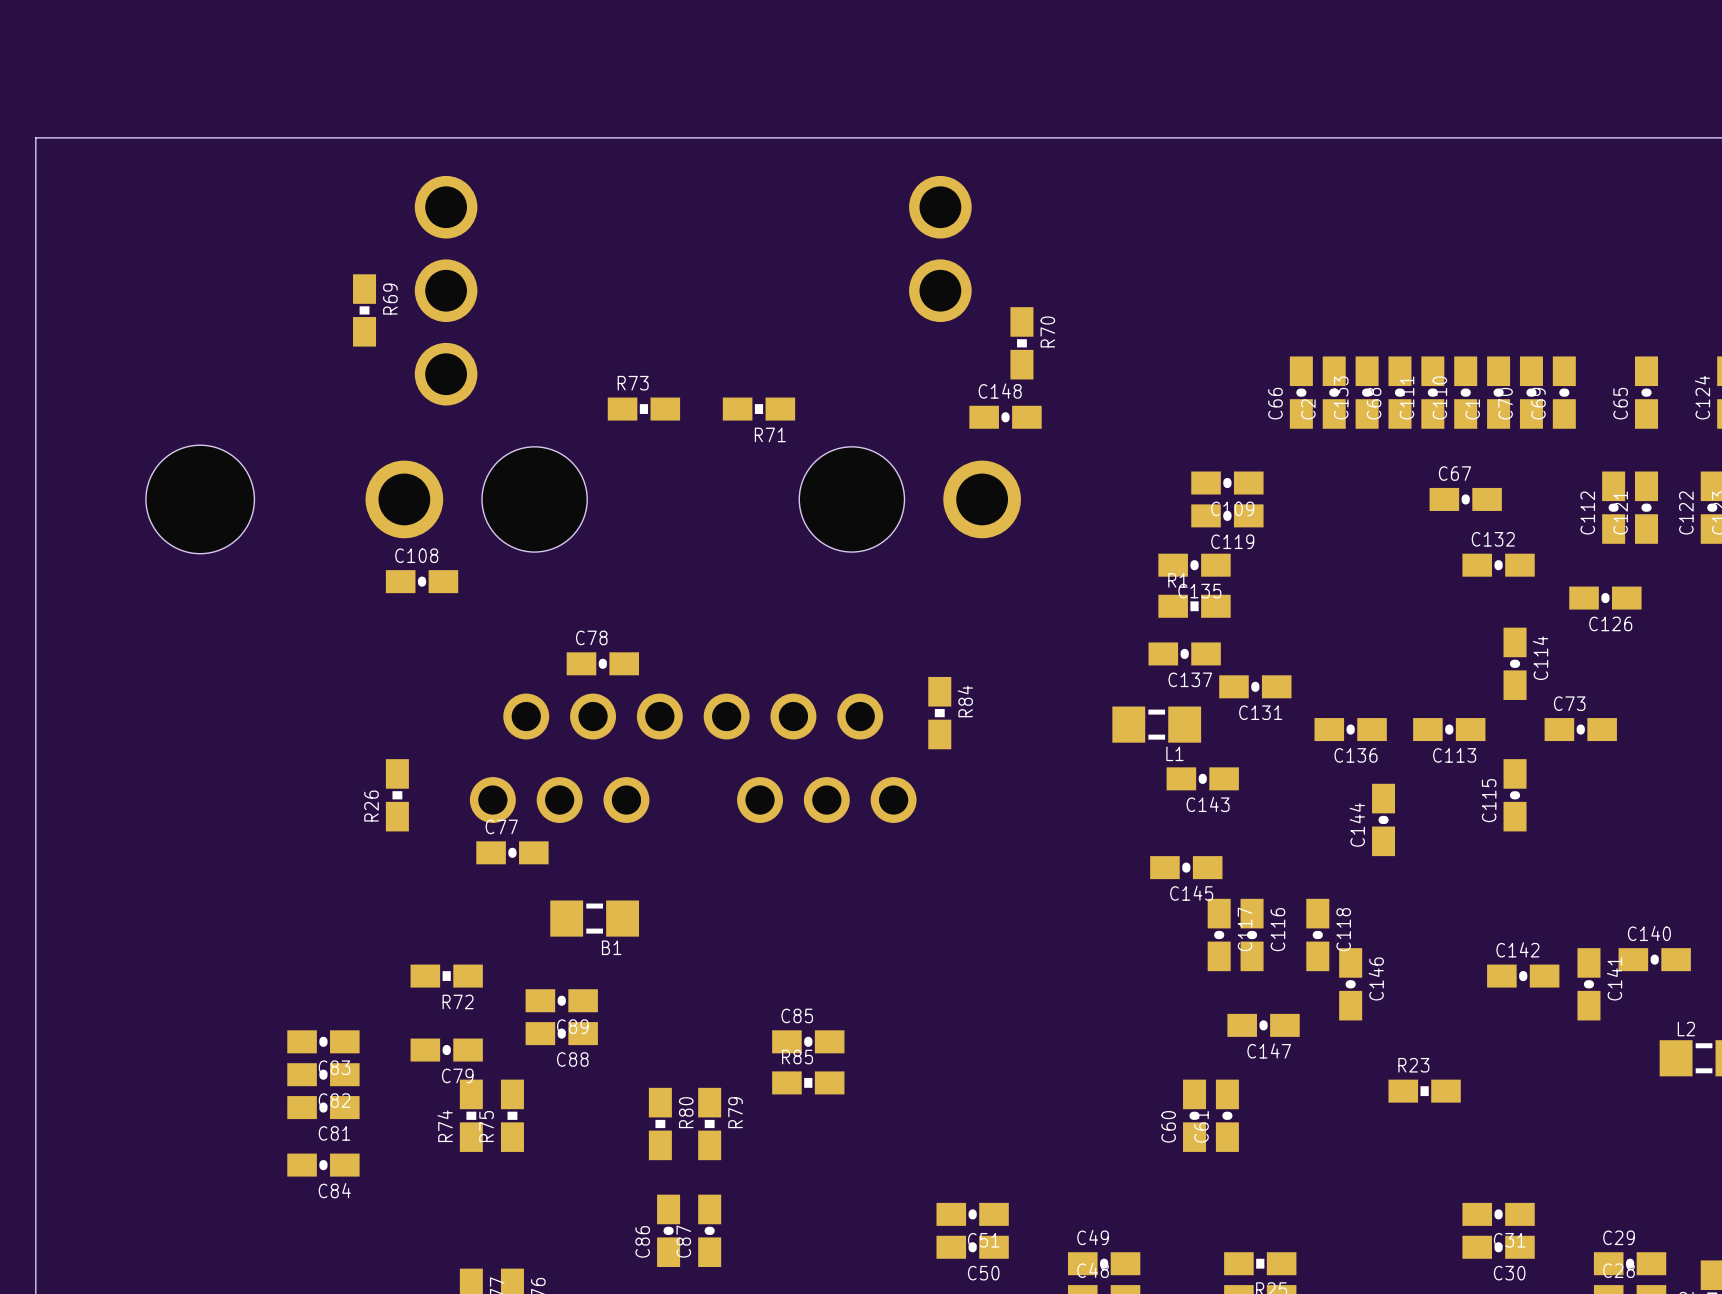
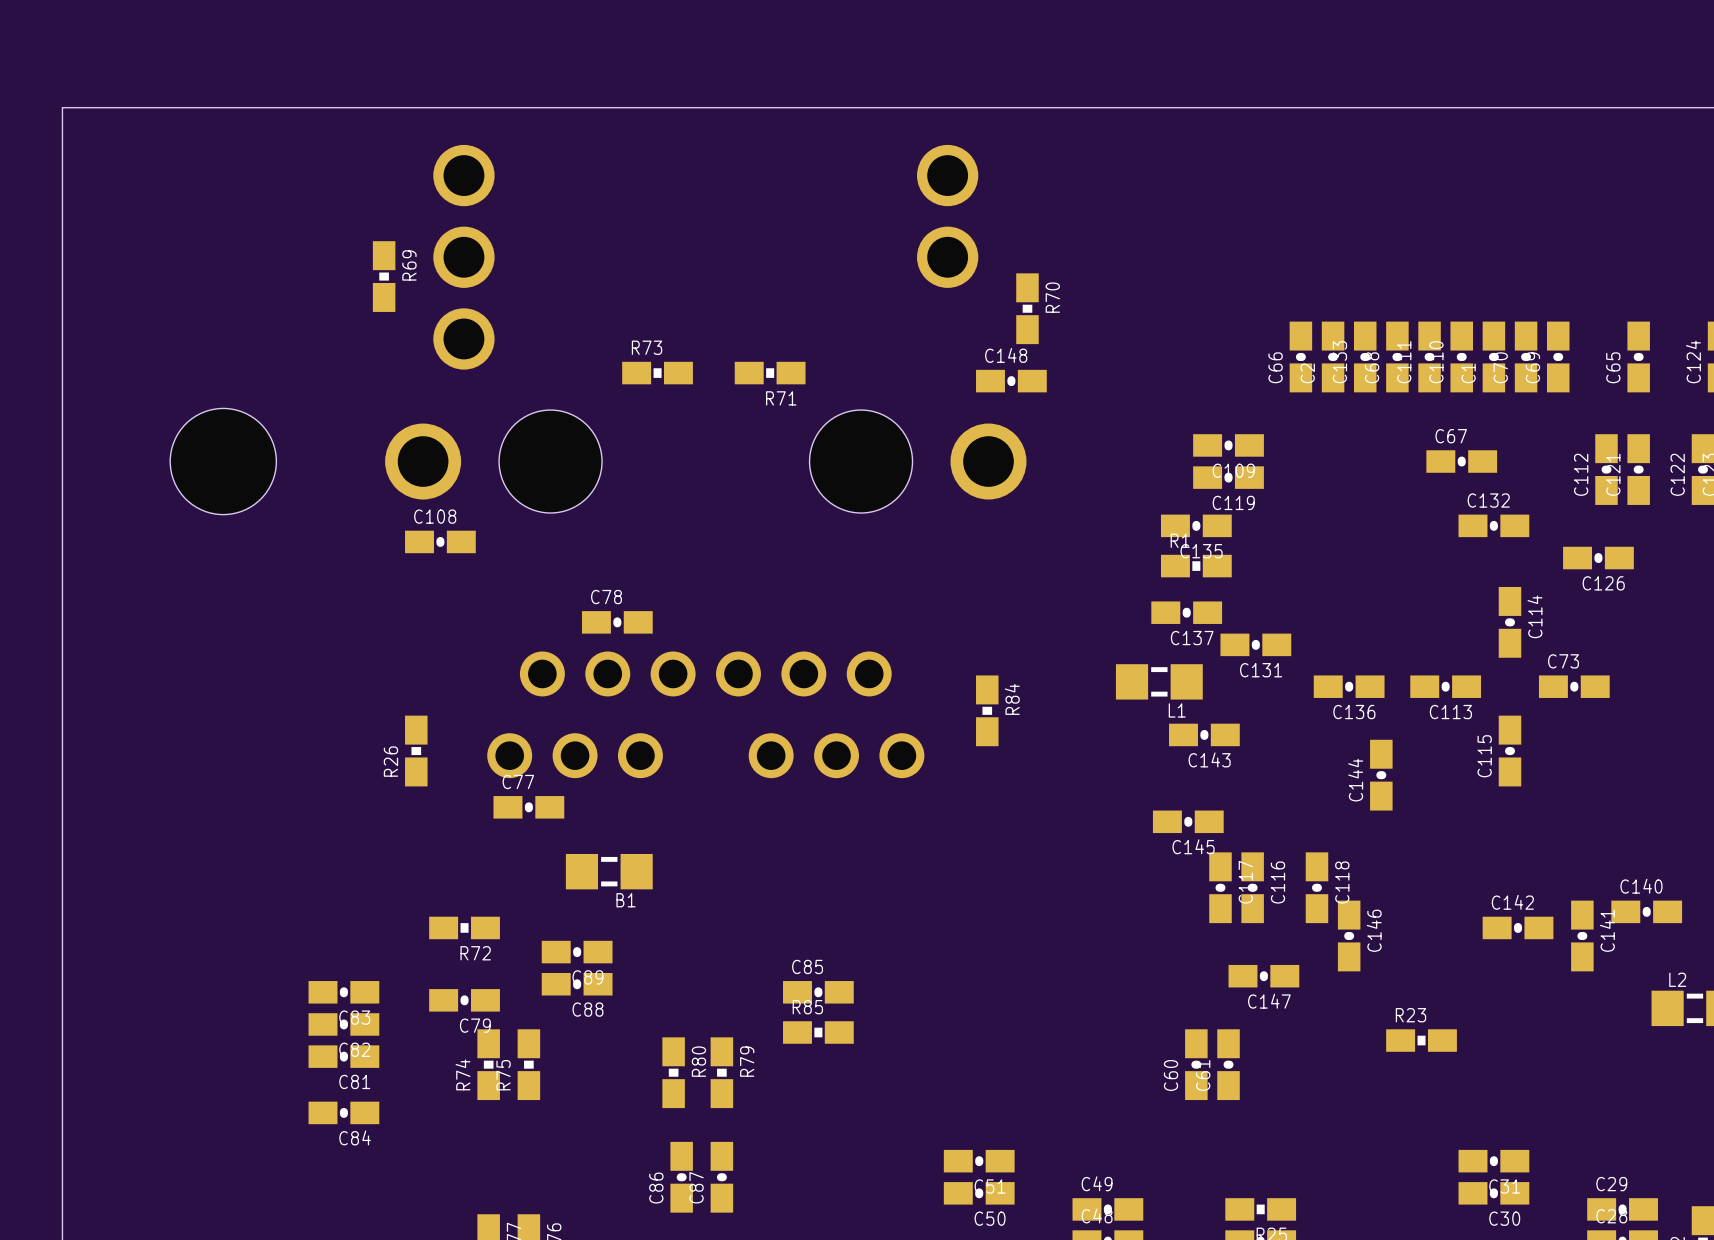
R84 position: (939, 713) -> (987, 710)

